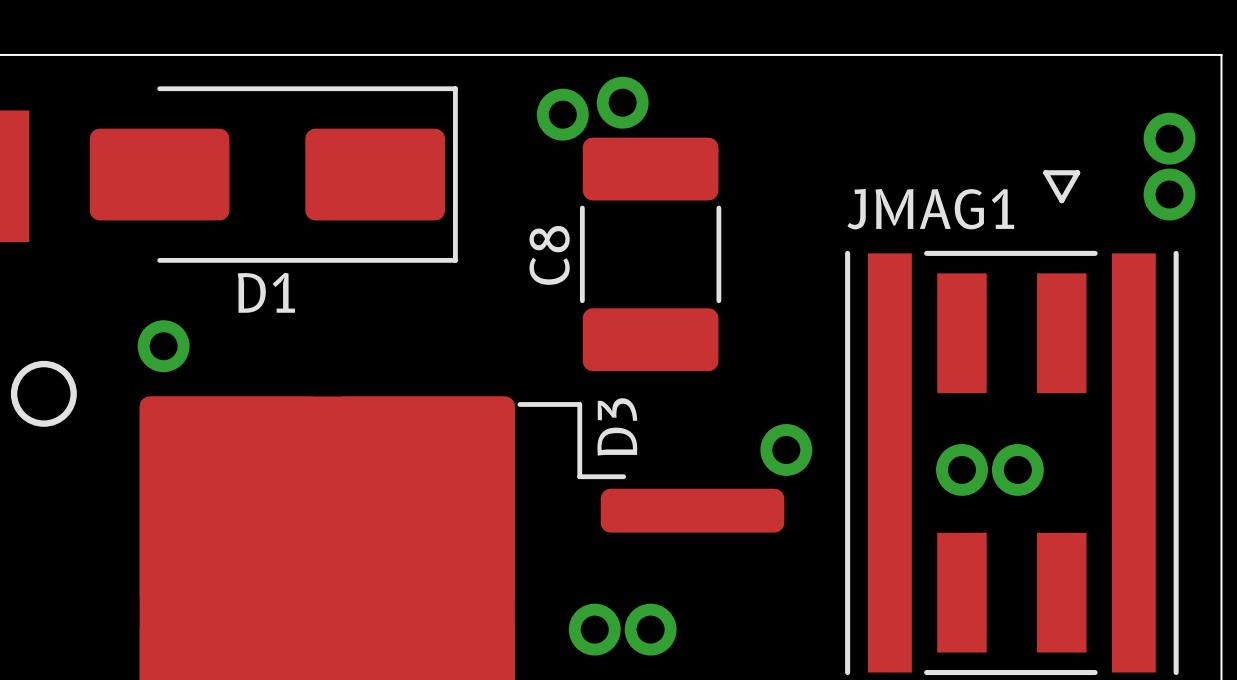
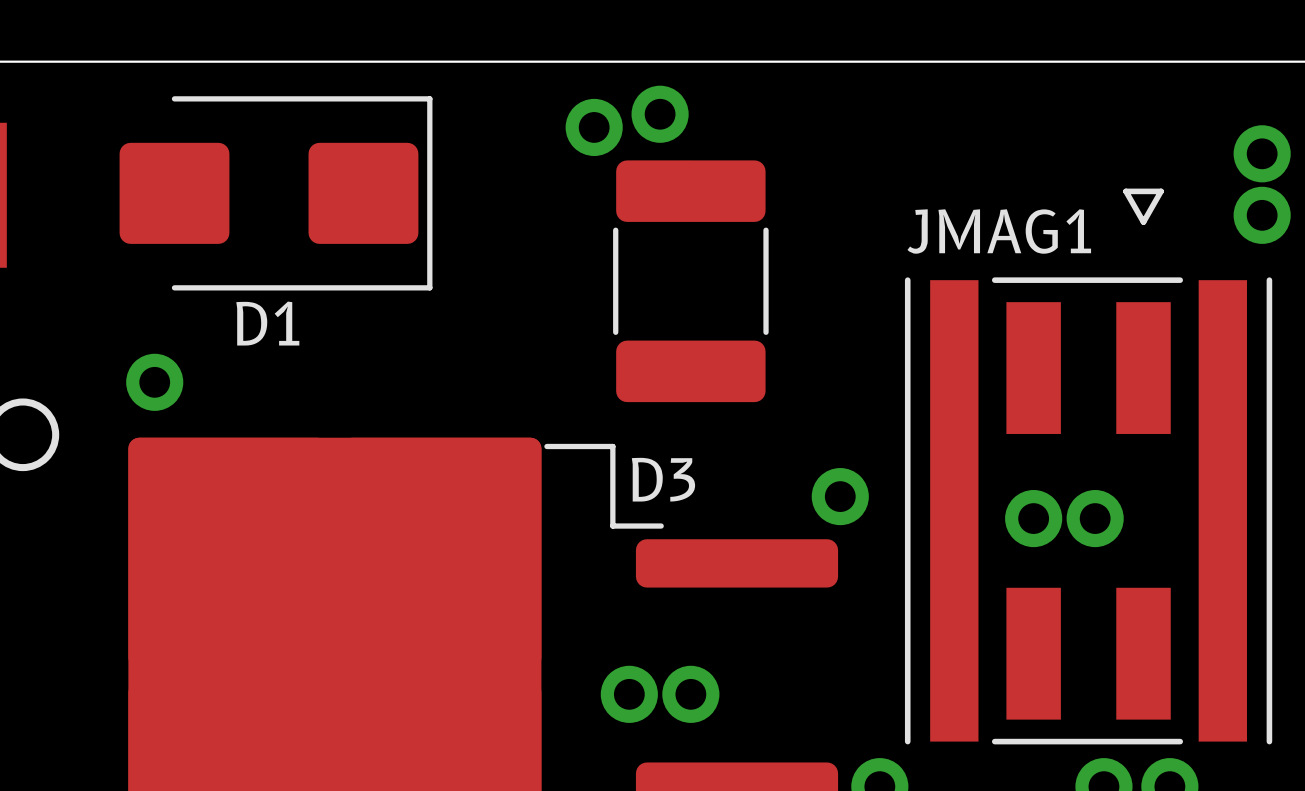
D1 footprint: [89, 86, 458, 263] -> [119, 96, 433, 291]
C8: (650, 254) -> none
part: none -> (690, 281)
D3 name rotation: 0° (617, 426) -> 90° clockwise (663, 479)

